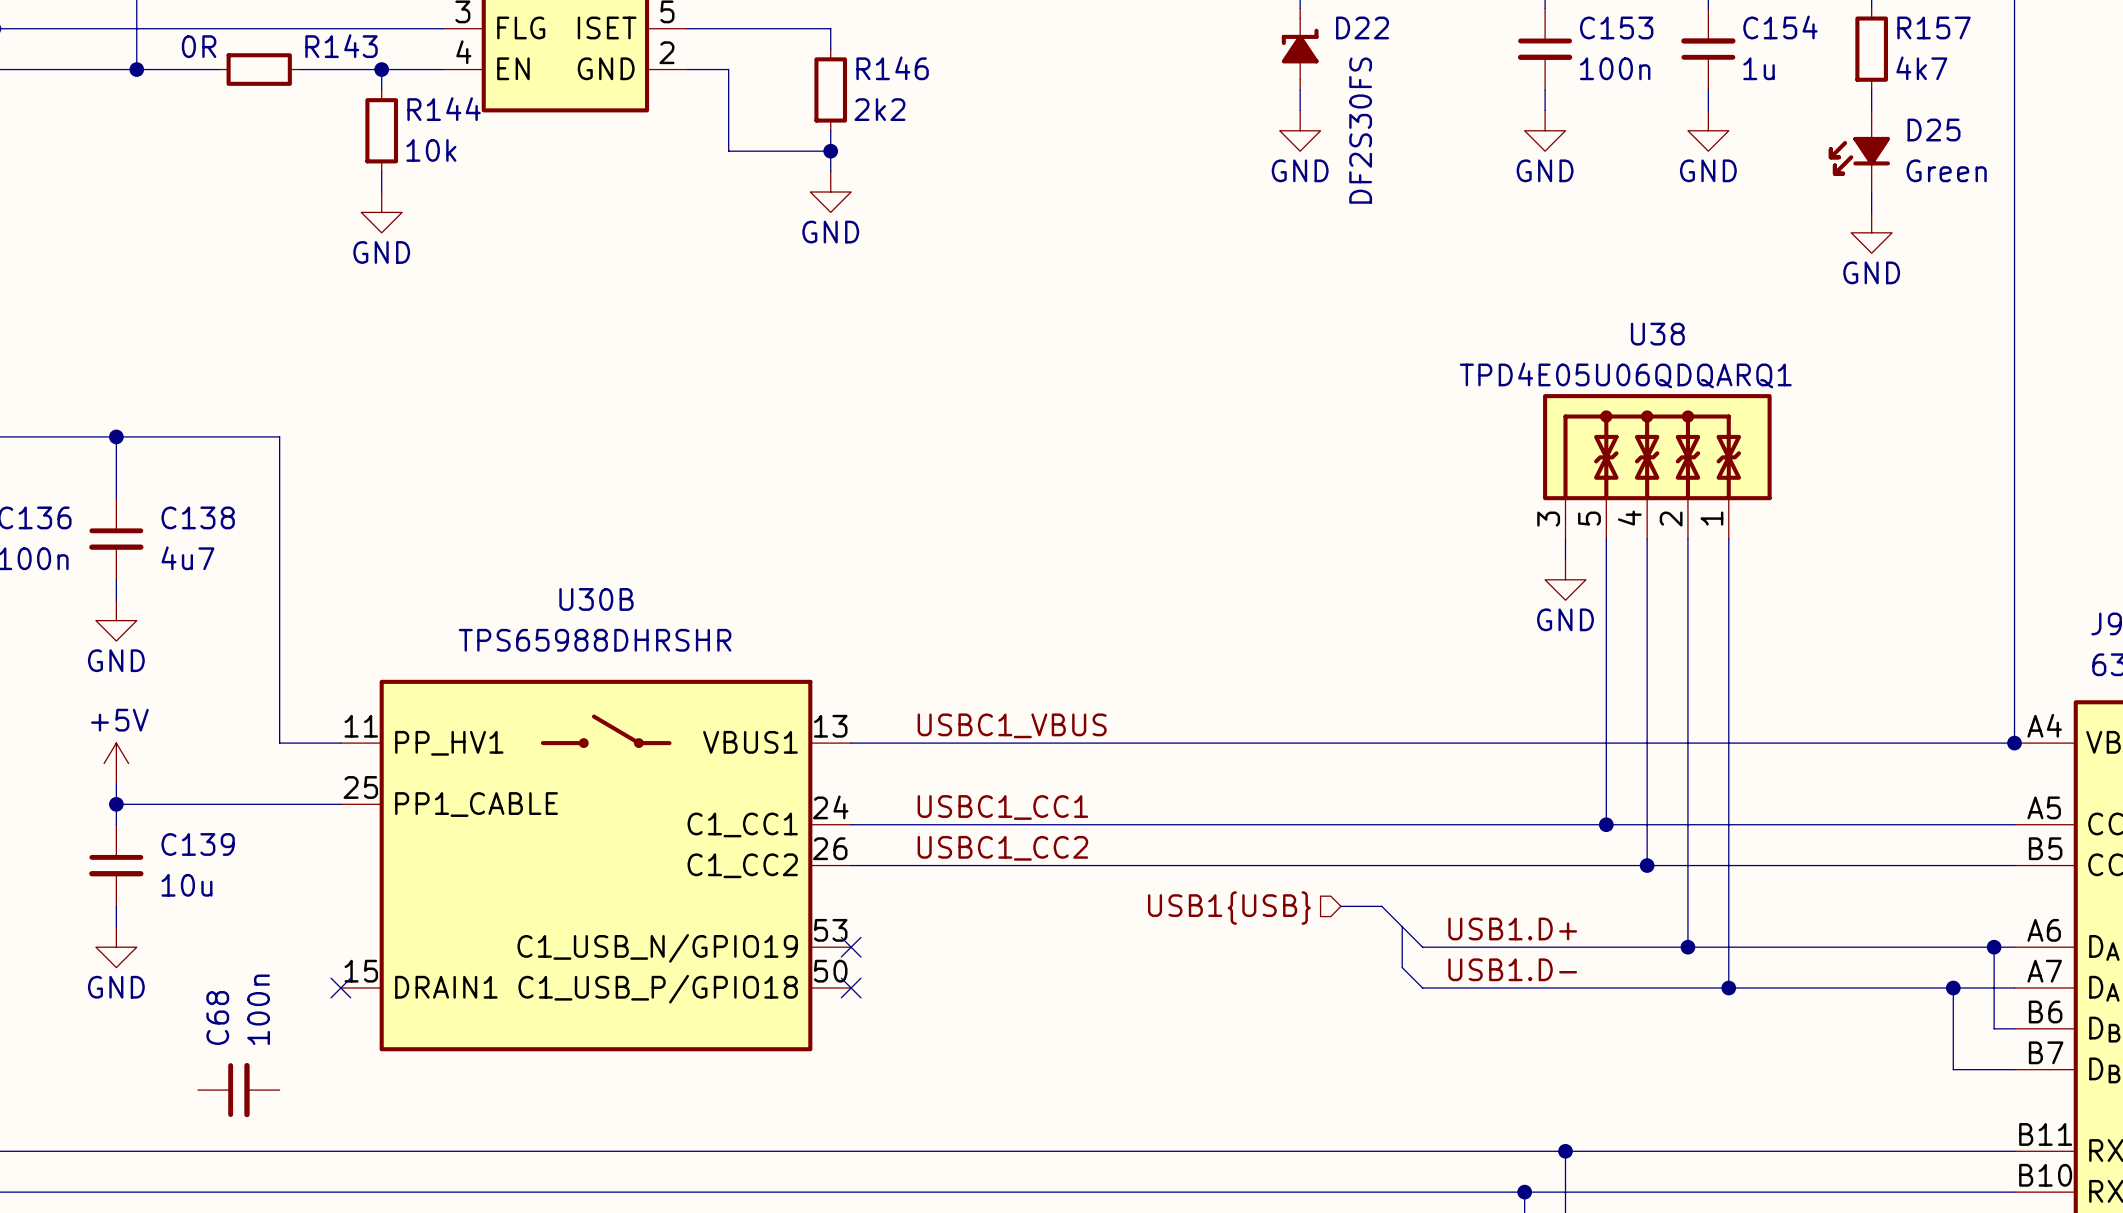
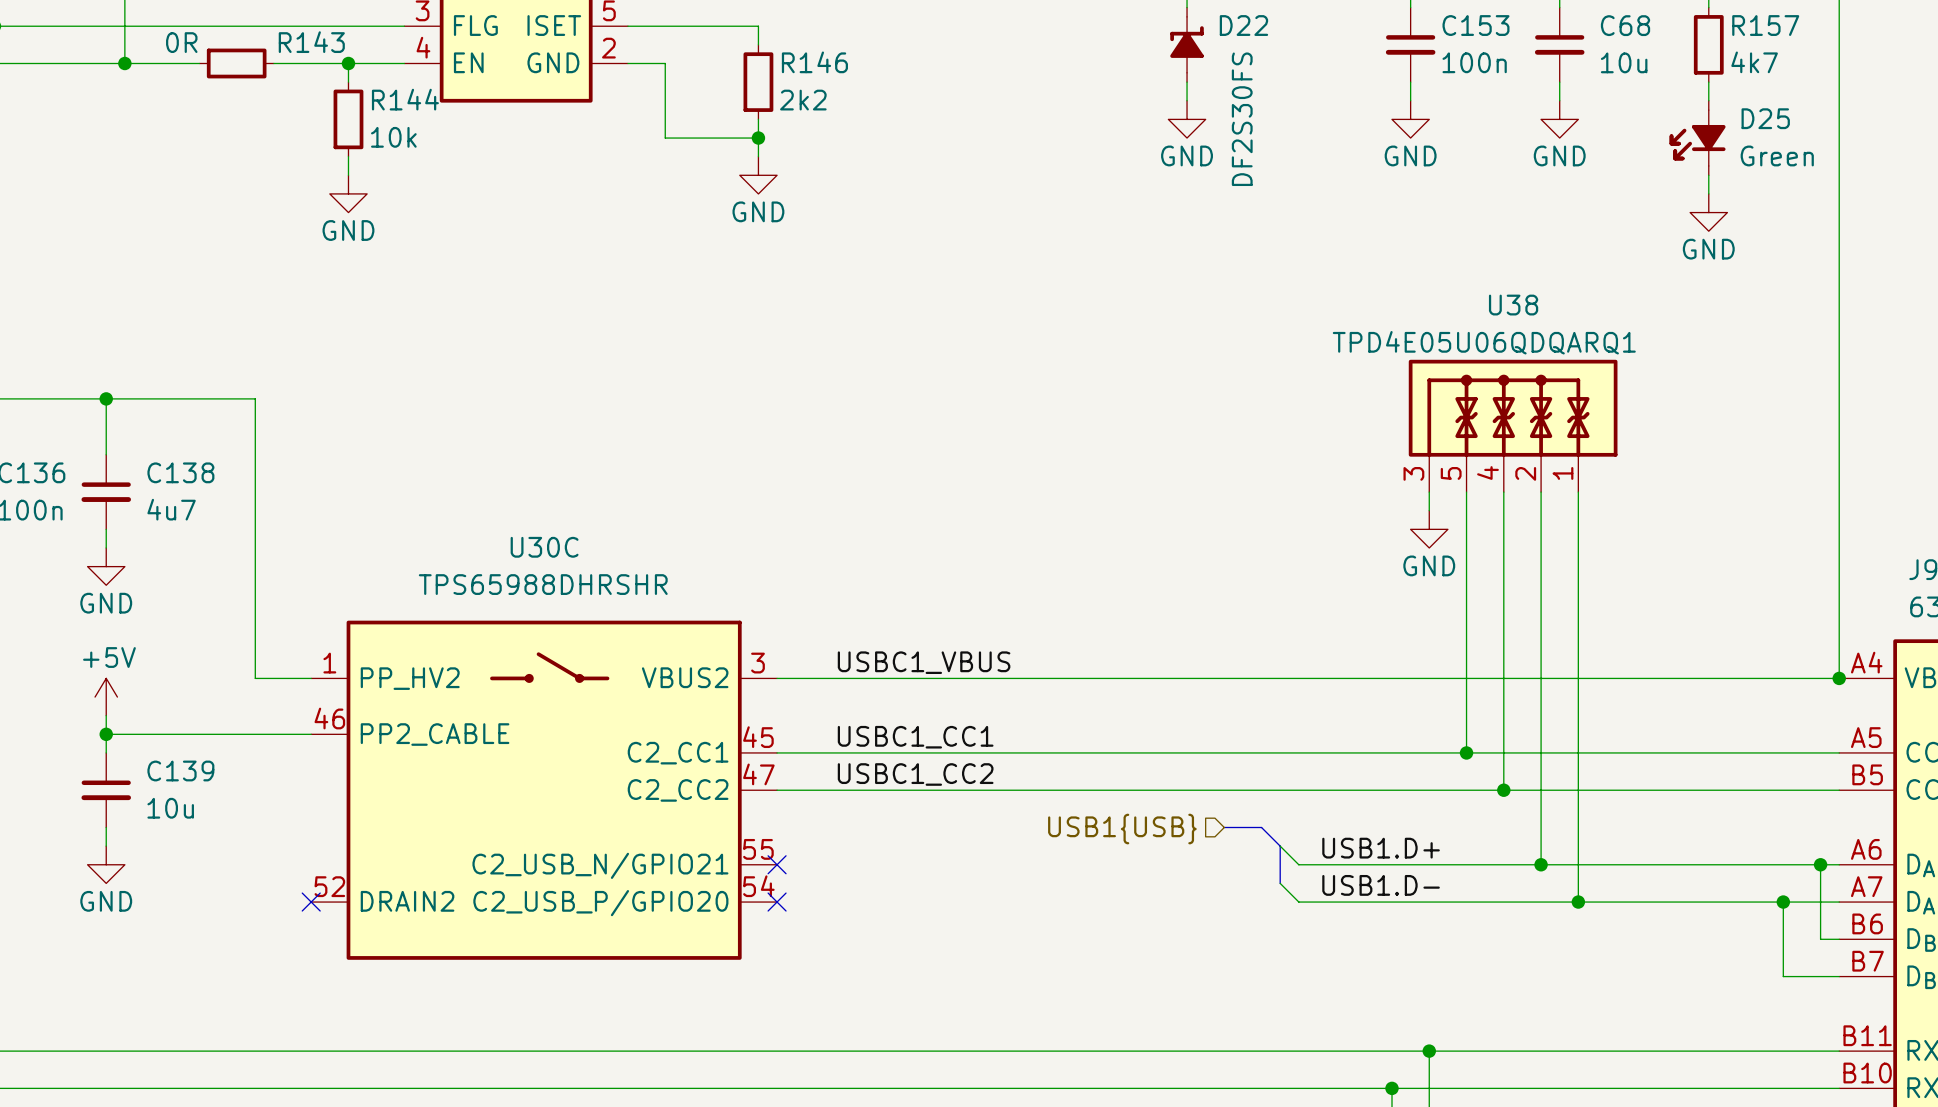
C154: (1708, 49) -> none
U30B: (596, 865) -> none
U30C: none -> (544, 790)
C68 text: 100n (258, 1009) -> 10u (1624, 62)
C68 rotation: 0° (238, 1090) -> 90° clockwise (1559, 44)
C68 position: (238, 1090) -> (1559, 44)

